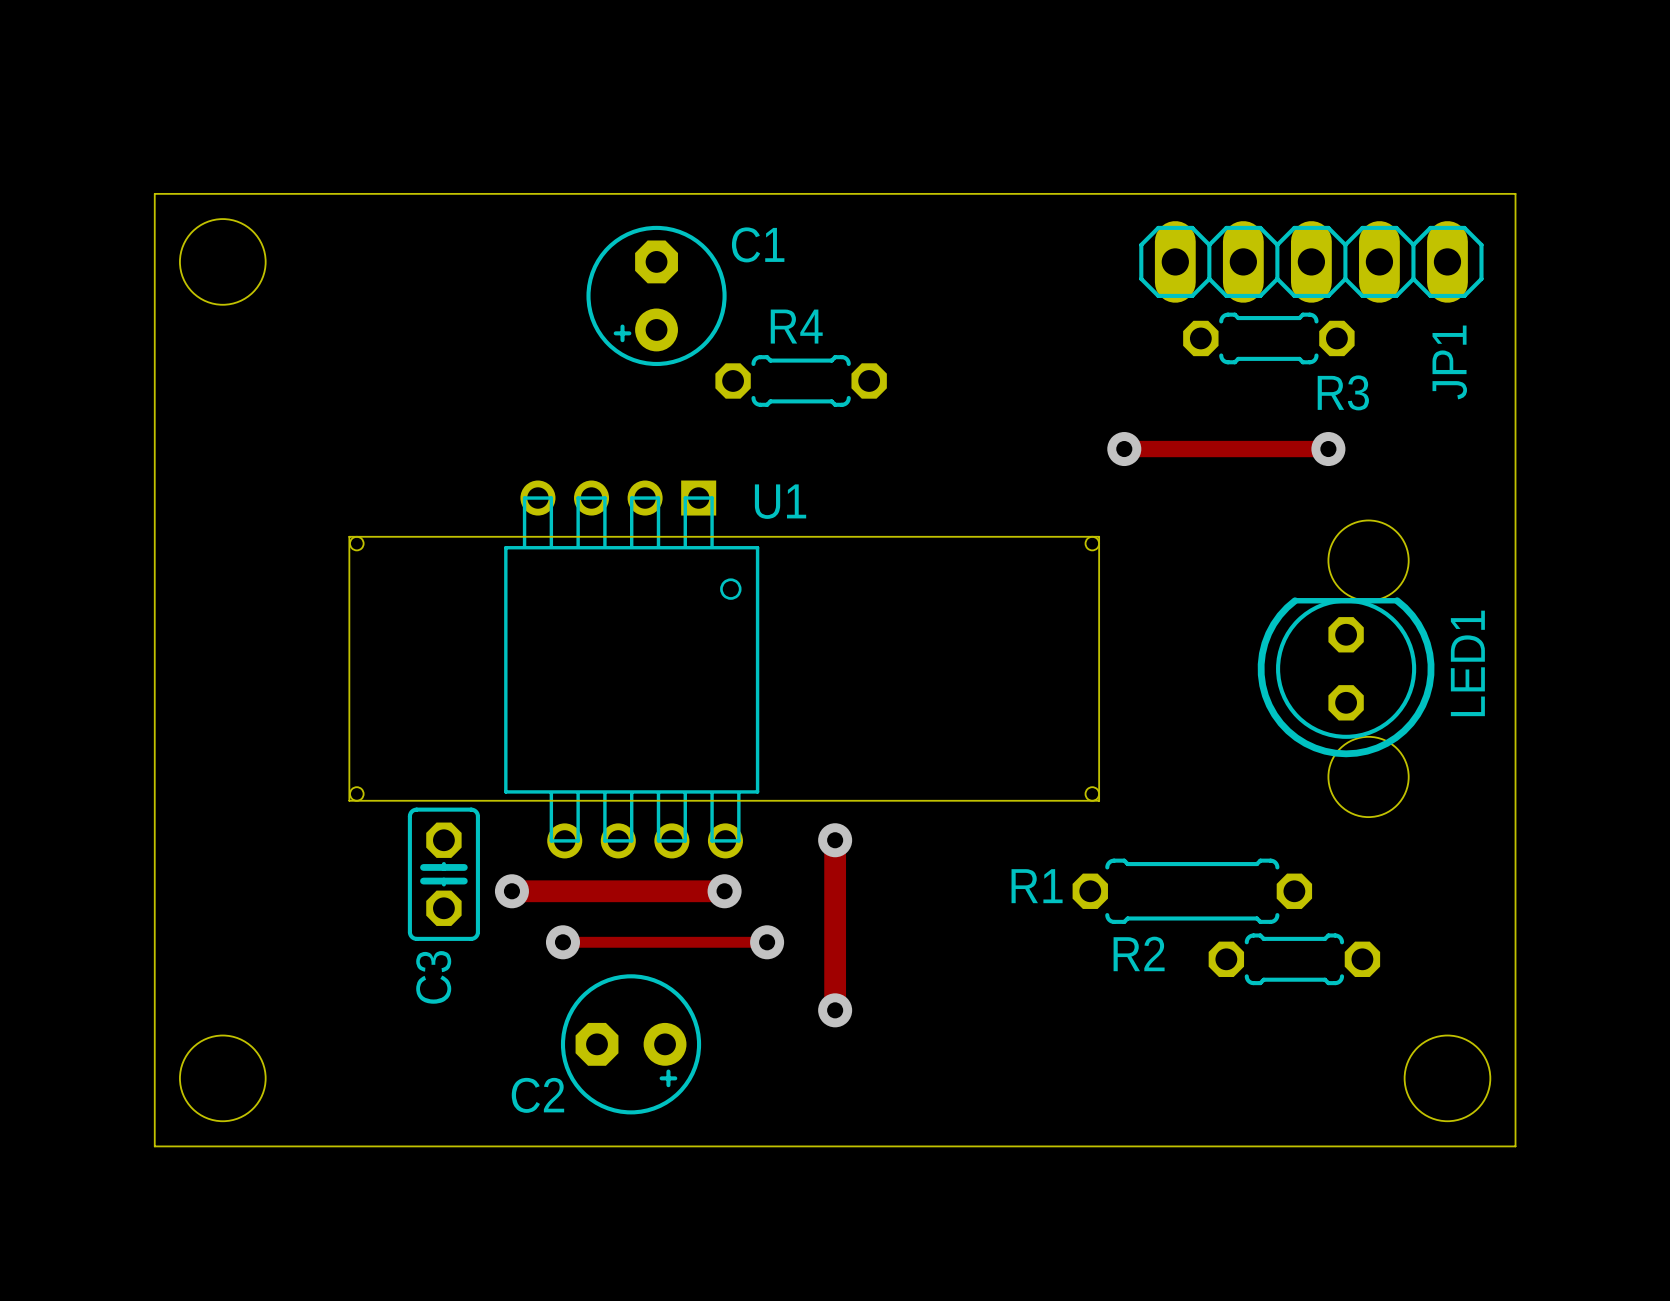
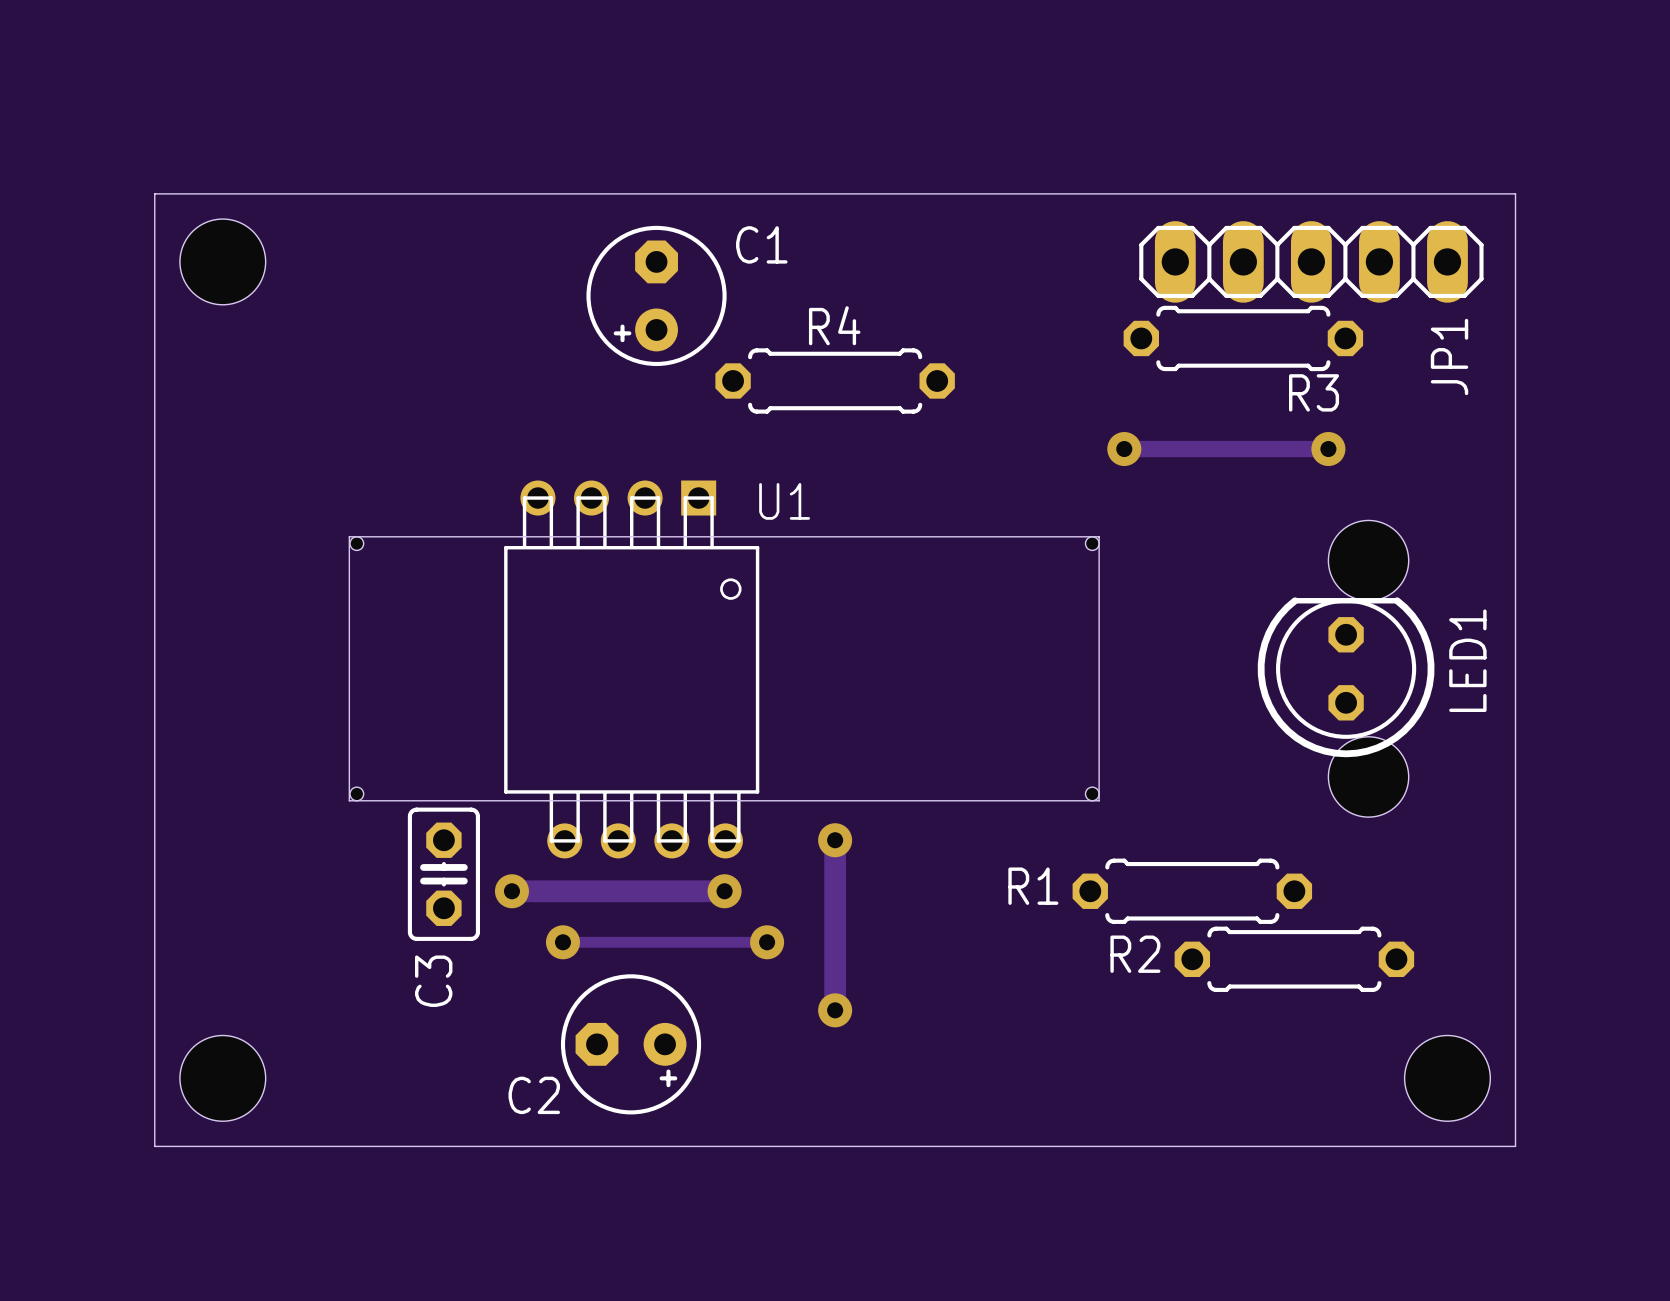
R3 footprint: [1183, 312, 1355, 365] -> [1123, 305, 1364, 372]
R4 footprint: [715, 355, 887, 407] -> [715, 348, 955, 414]
R2 footprint: [1208, 933, 1381, 986] -> [1174, 926, 1415, 992]

